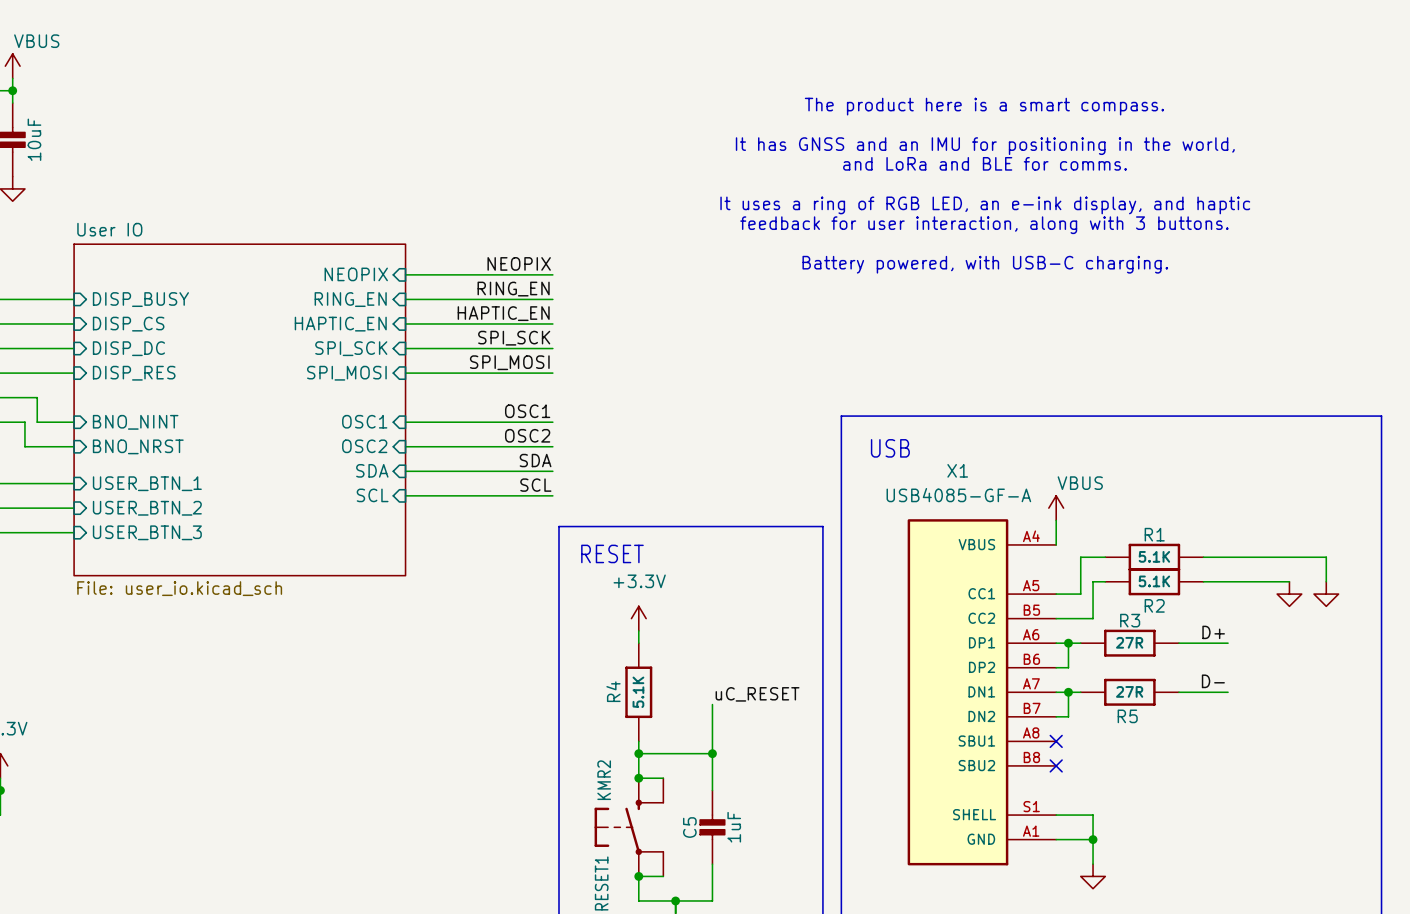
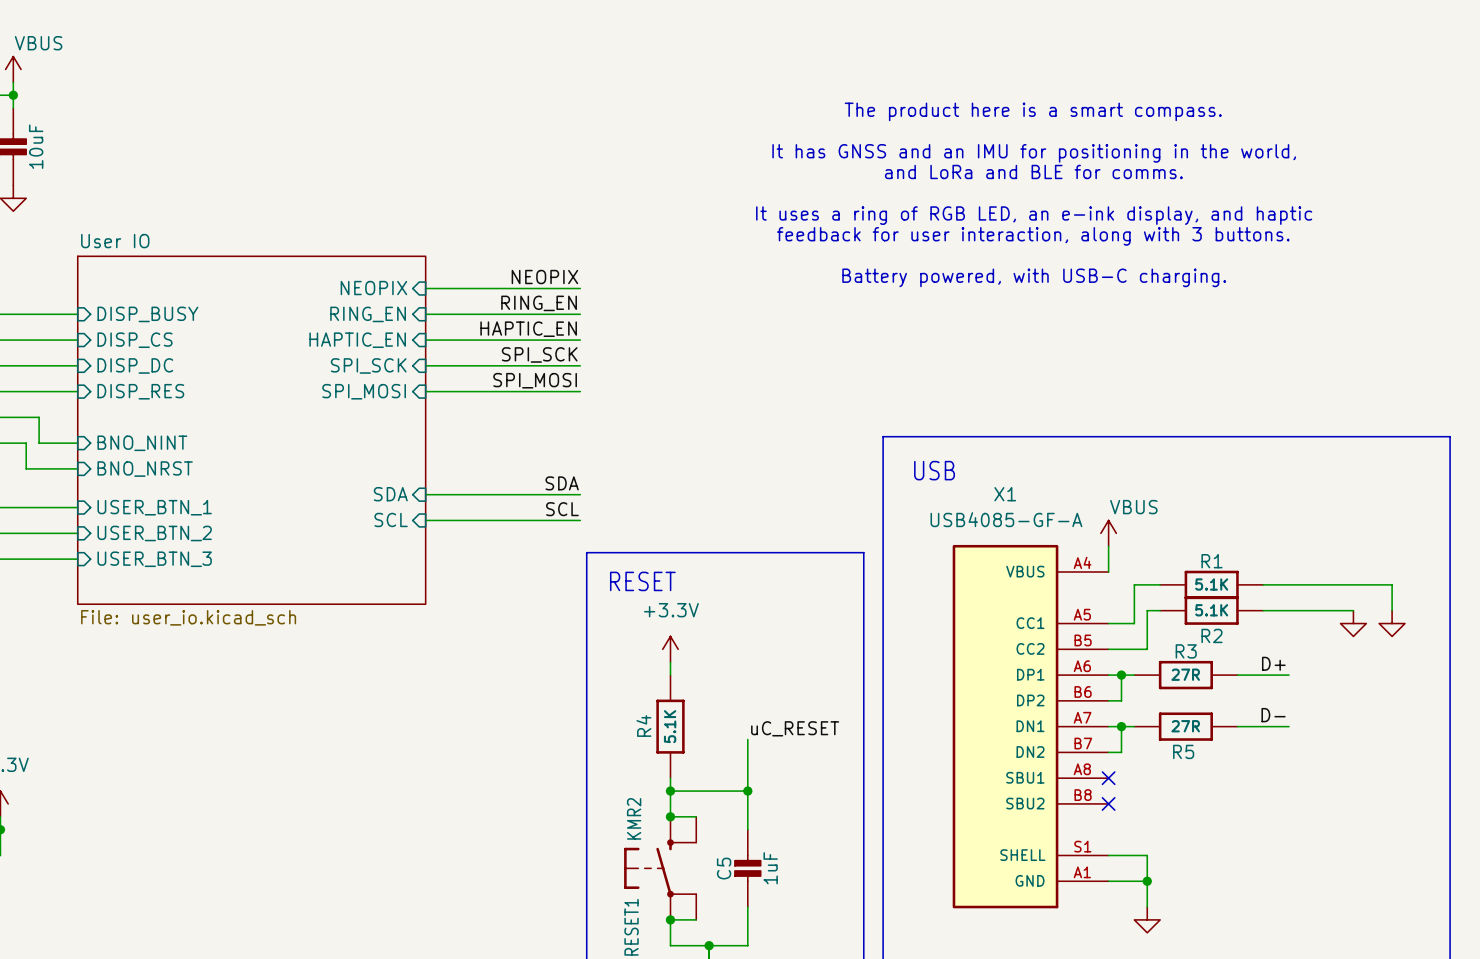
label: OSC1 (527, 411) -> none
sheet pin: OSC1 (364, 421) -> none
wire: (405, 422) (552, 422) -> none
label: OSC2 (527, 435) -> none
sheet pin: OSC2 (364, 446) -> none
wire: (405, 446) (552, 446) -> none

